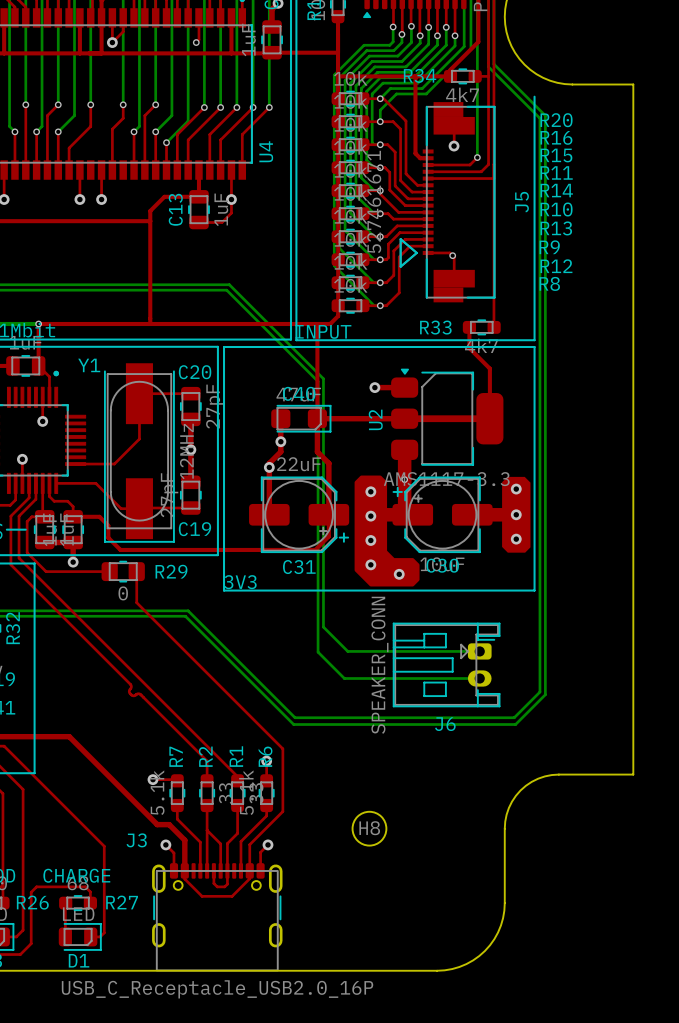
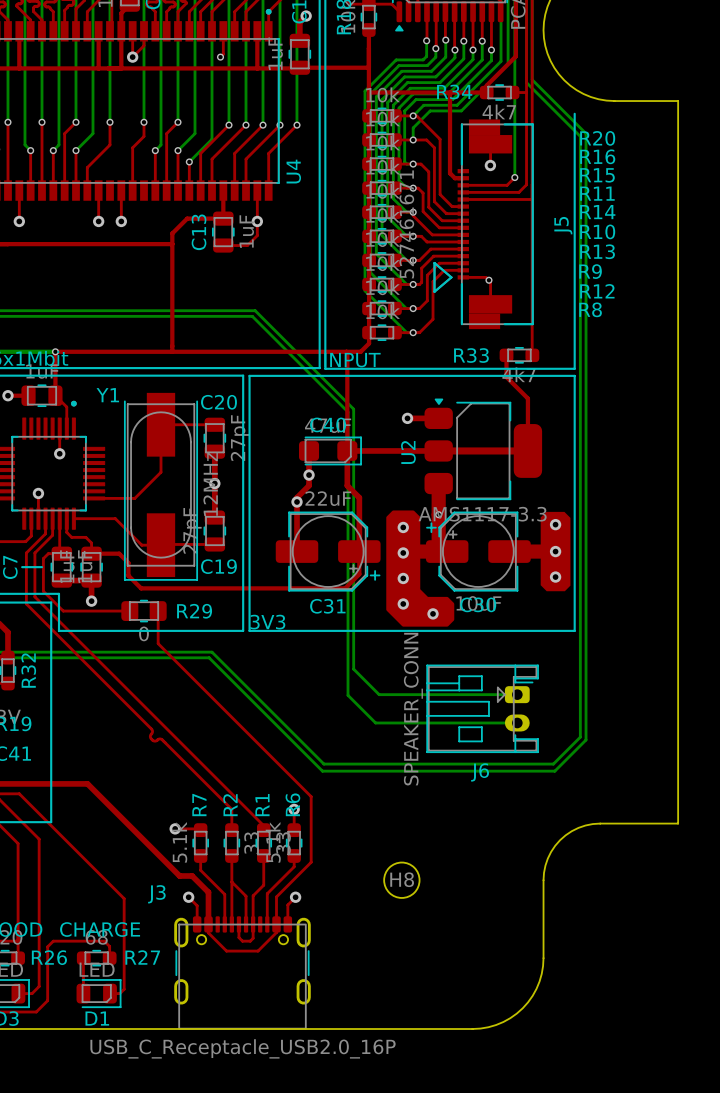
line: (42, 555) (217, 555) -> (58, 593) (58, 630) (243, 630) (243, 593)

